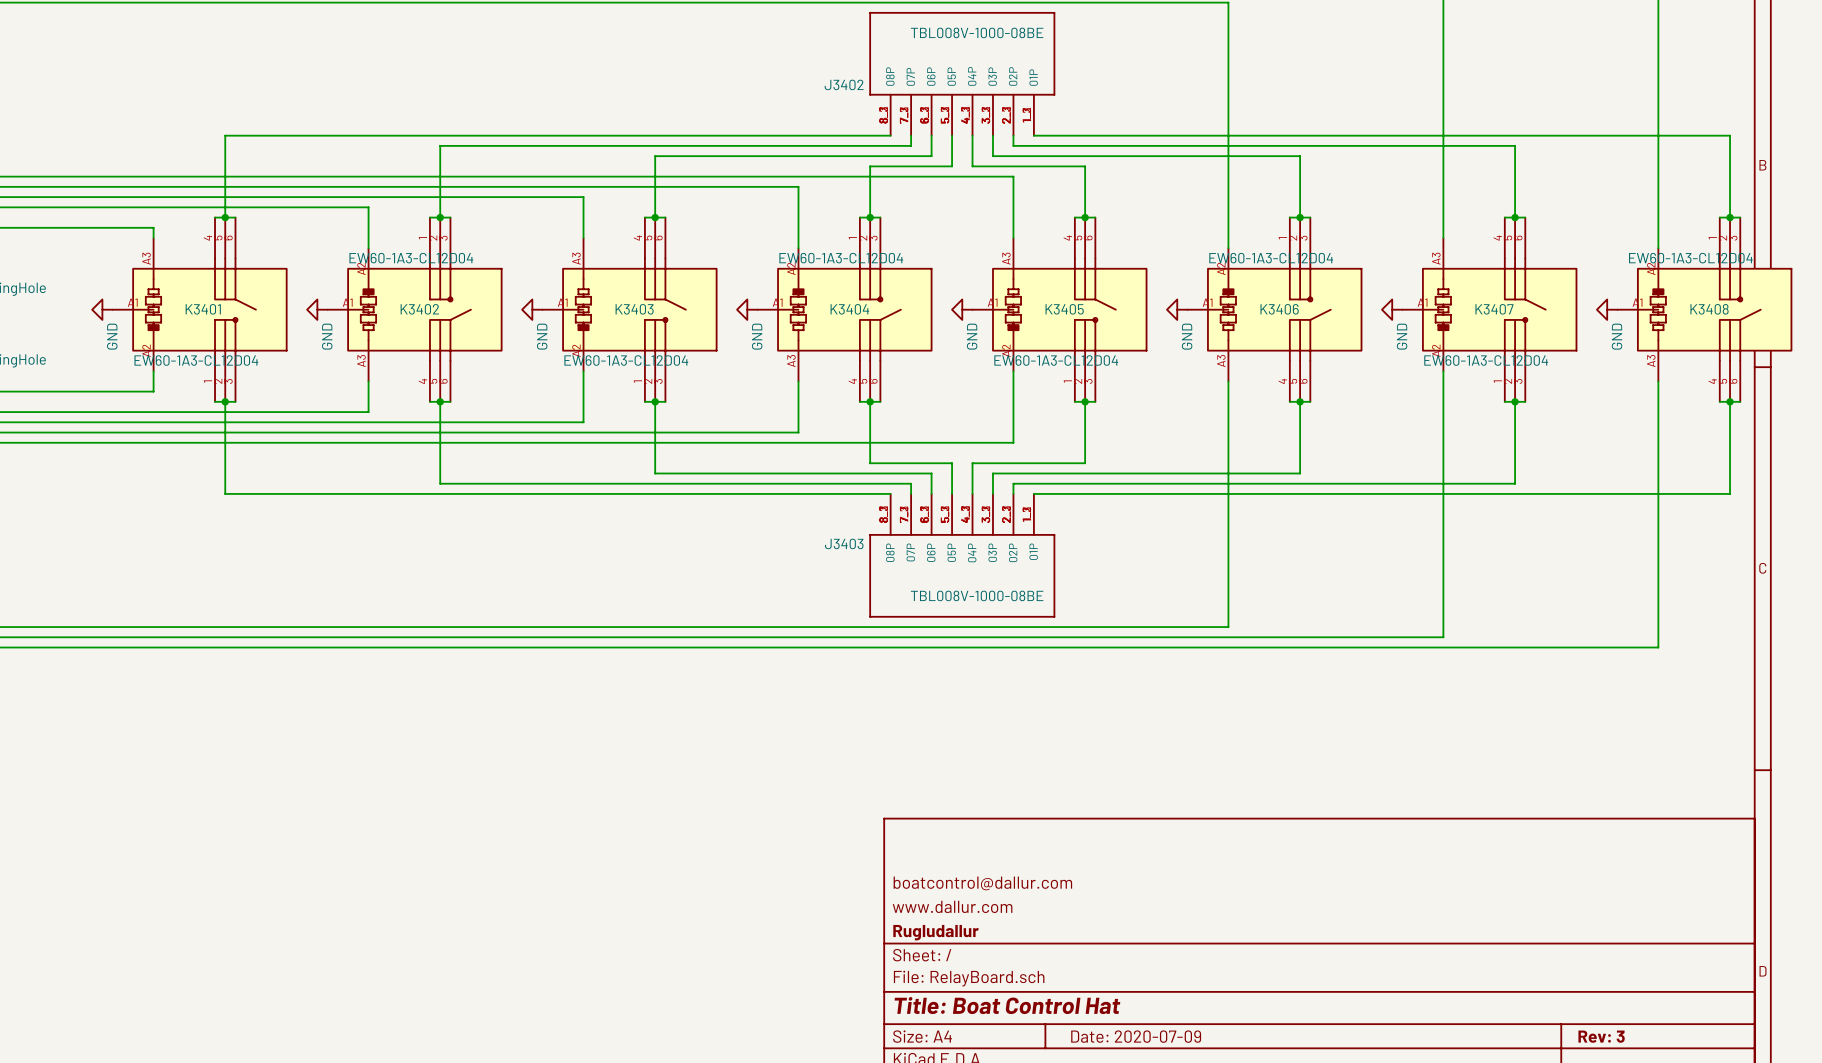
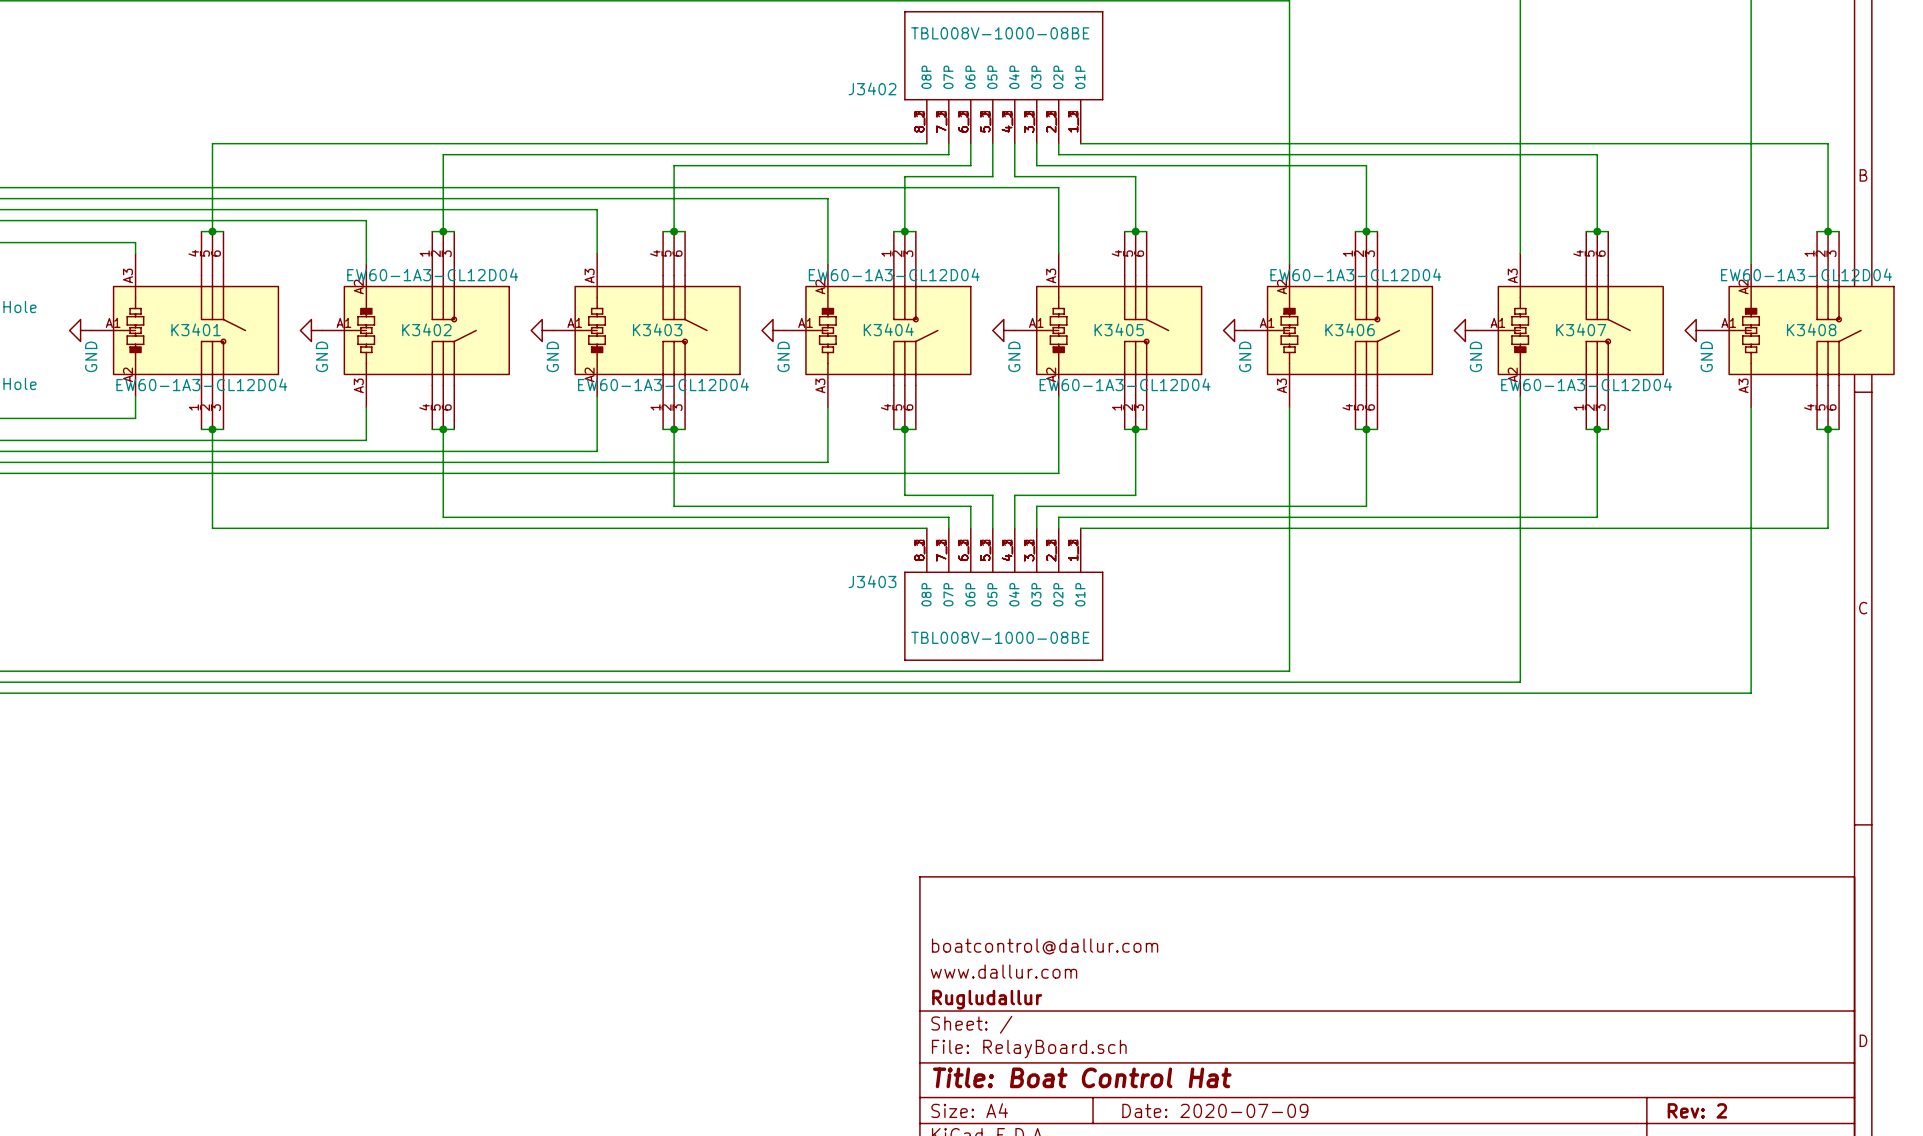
title block: Rev: 3 (1601, 1036) -> Rev: 2 (1697, 1110)

